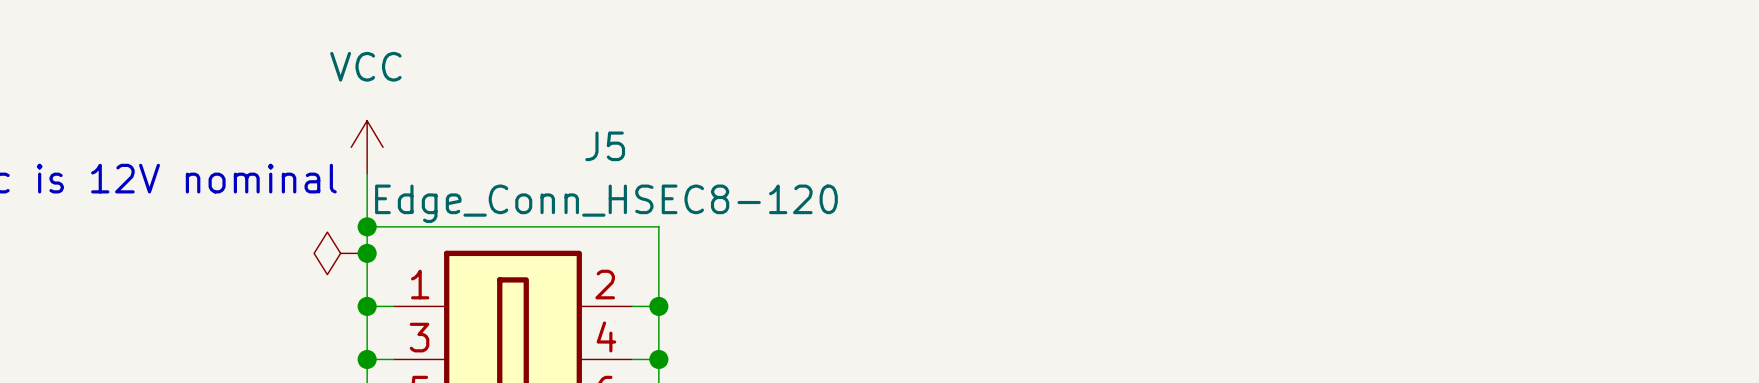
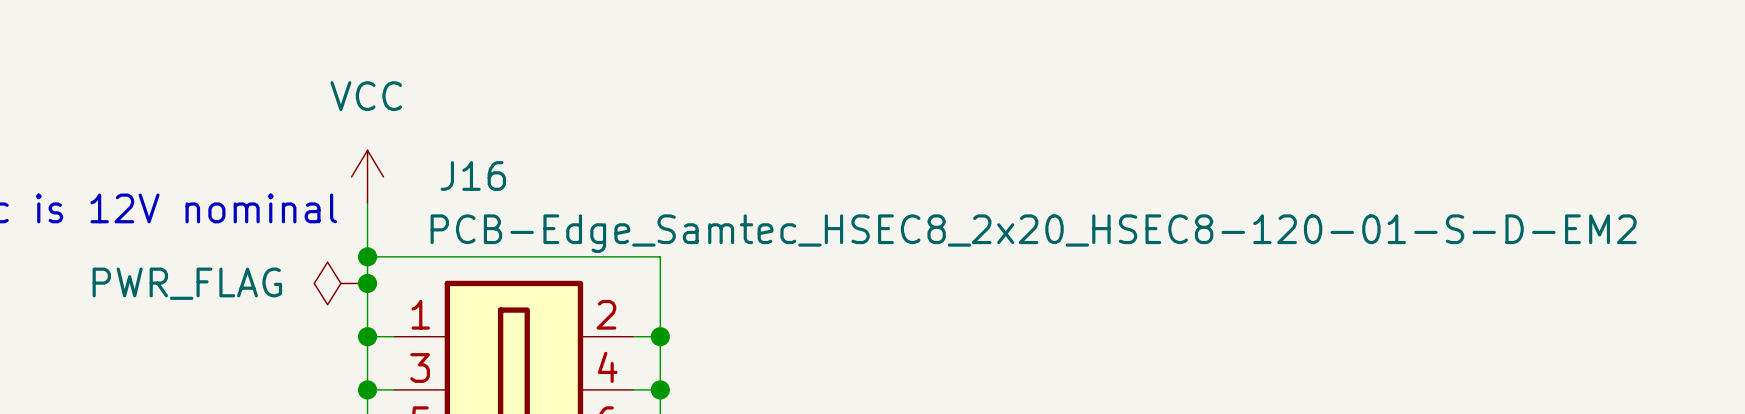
J5 name: J5 (605, 146) -> J16 (473, 176)
J5 value: Edge_Conn_HSEC8-120 (606, 203) -> PCB-Edge_Samtec_HSEC8_2x20_HSEC8-120-01-S-D-EM2 (1033, 233)
power symbol text: none -> PWR_FLAG (187, 283)

